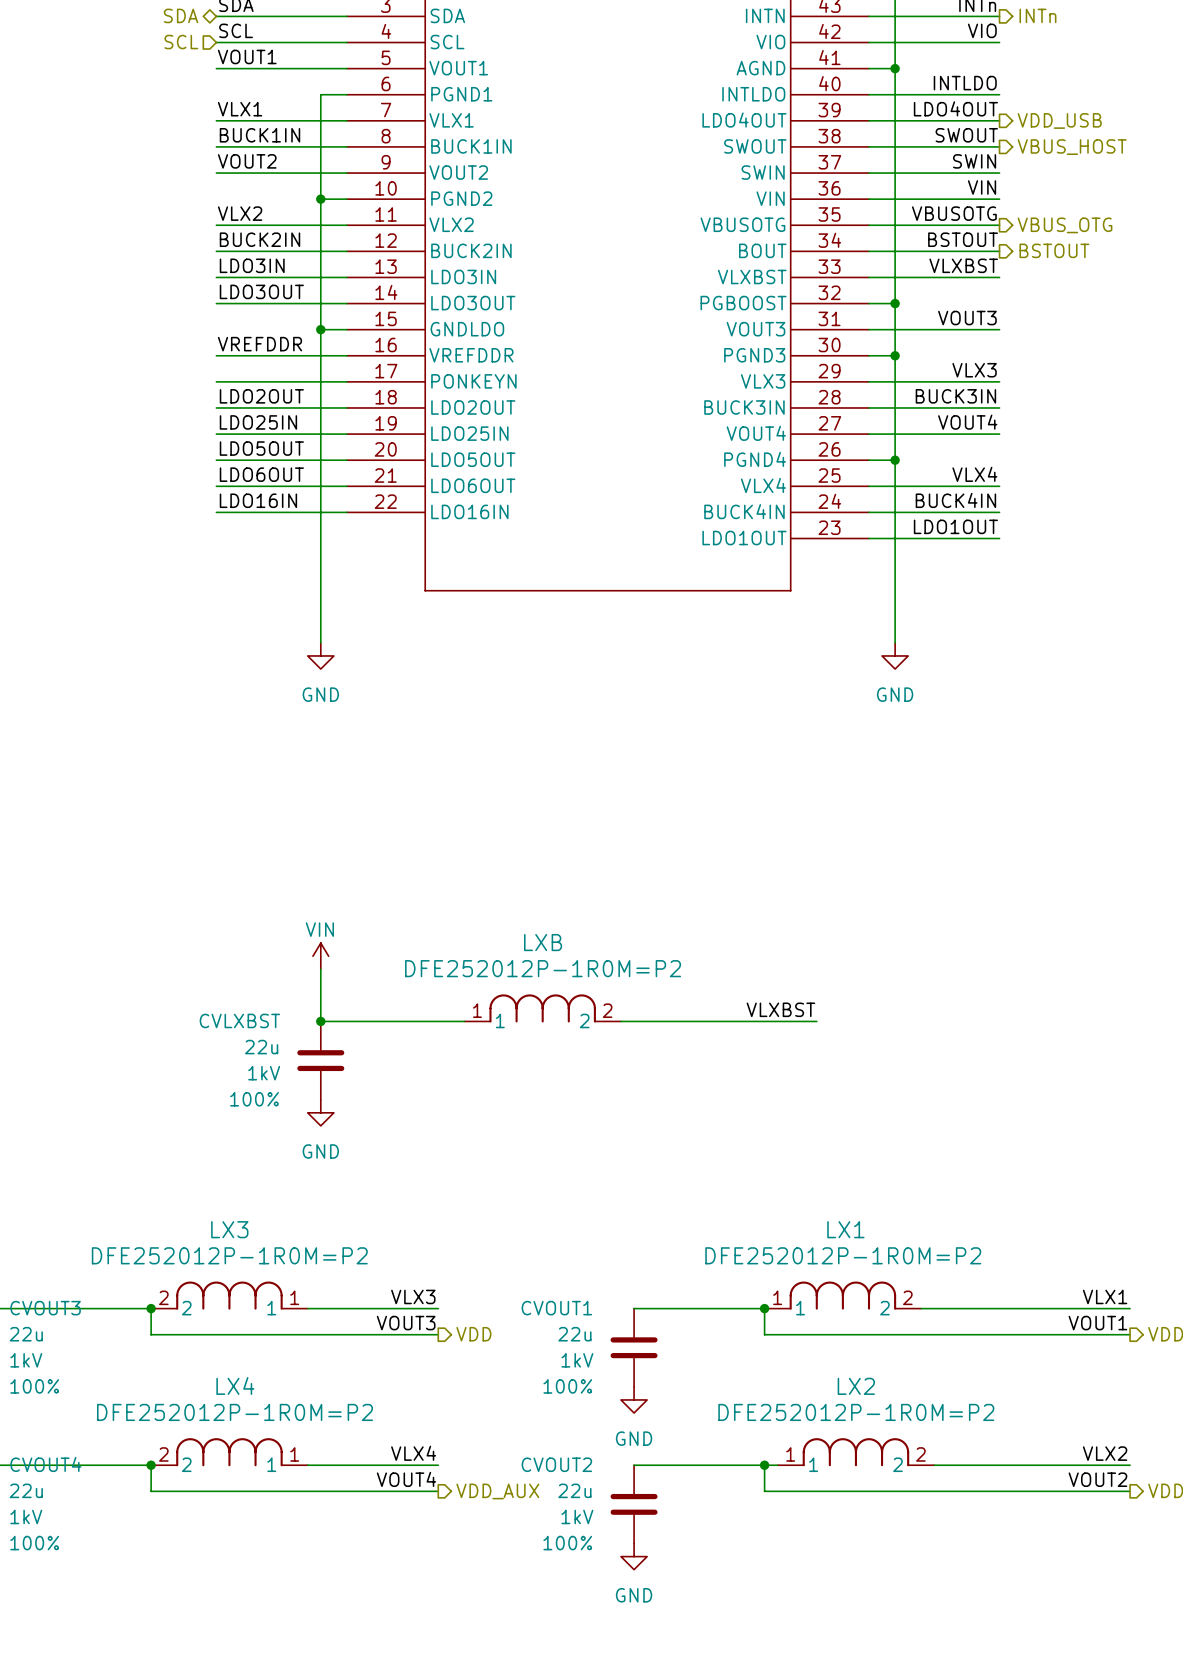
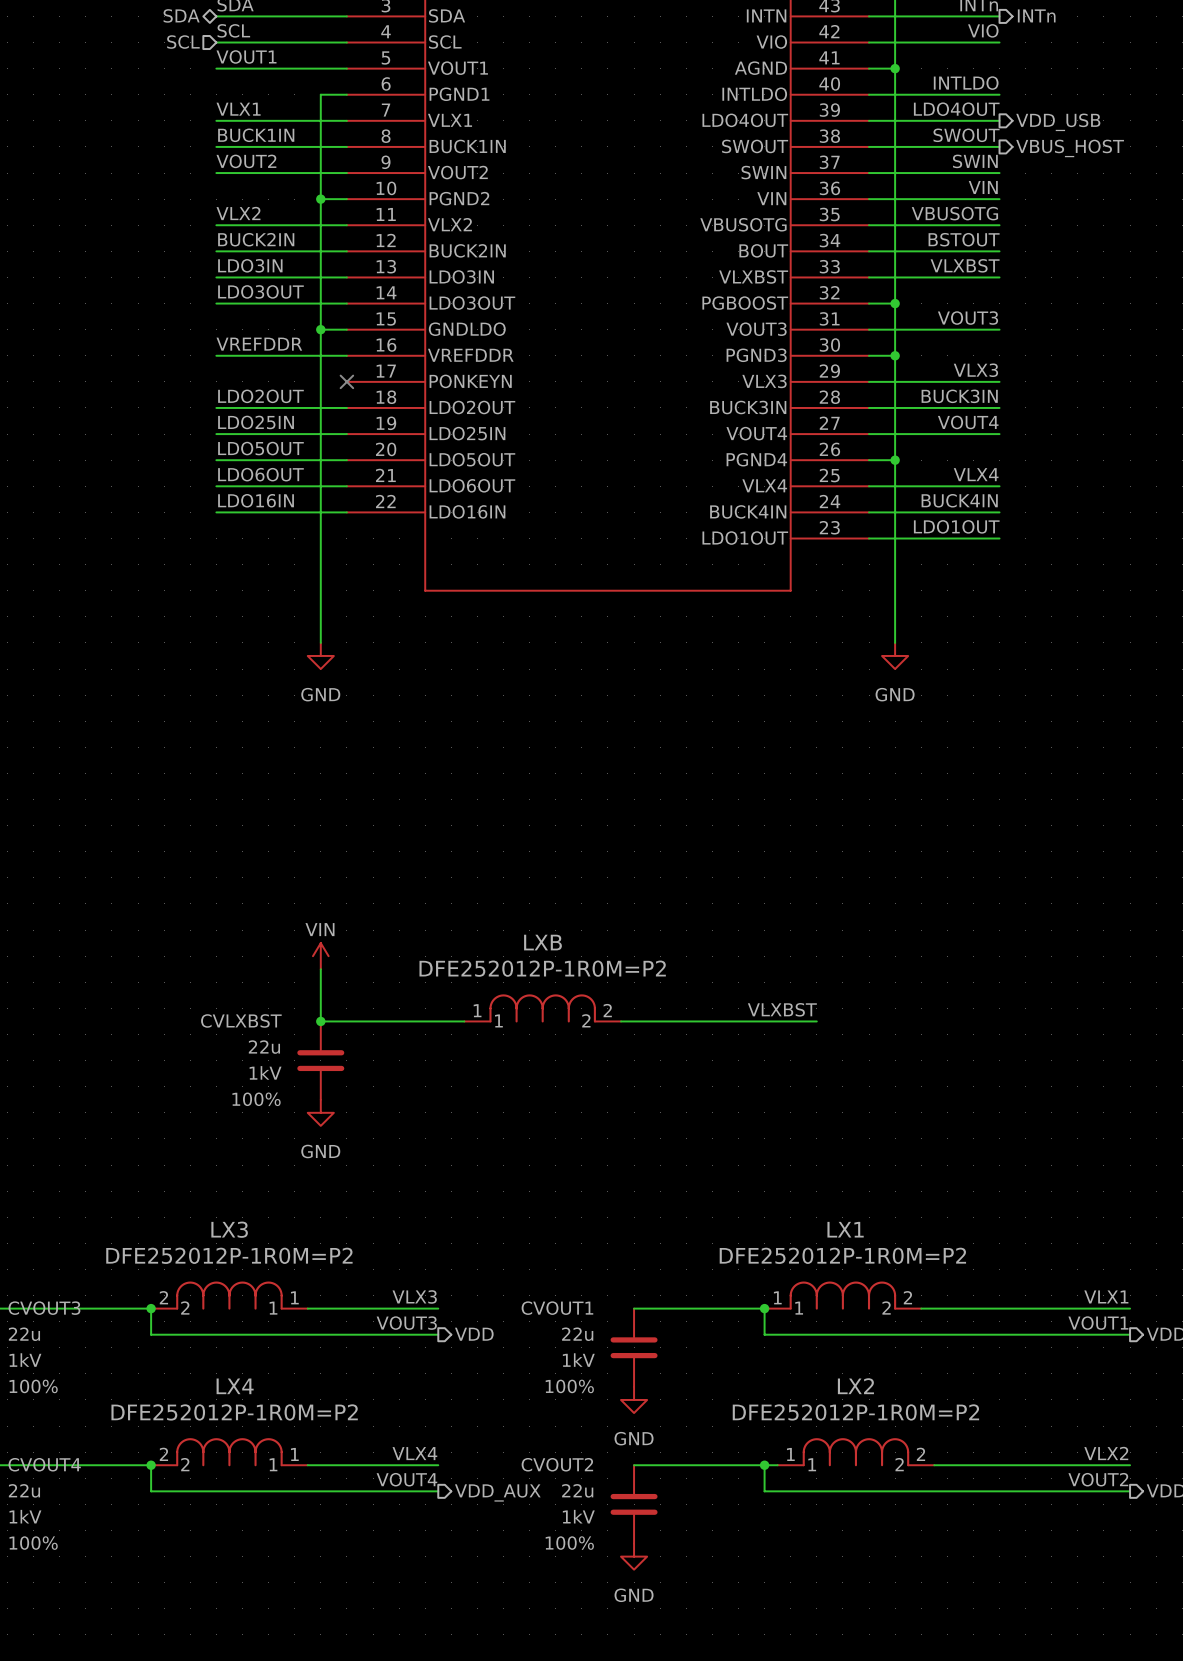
hierarchical label: VBUS_OTG (1064, 225) -> none
hierarchical label: BSTOUT (1054, 250) -> none
wire: (216, 381) (346, 381) -> none
no-connect mark: none -> (346, 381)

